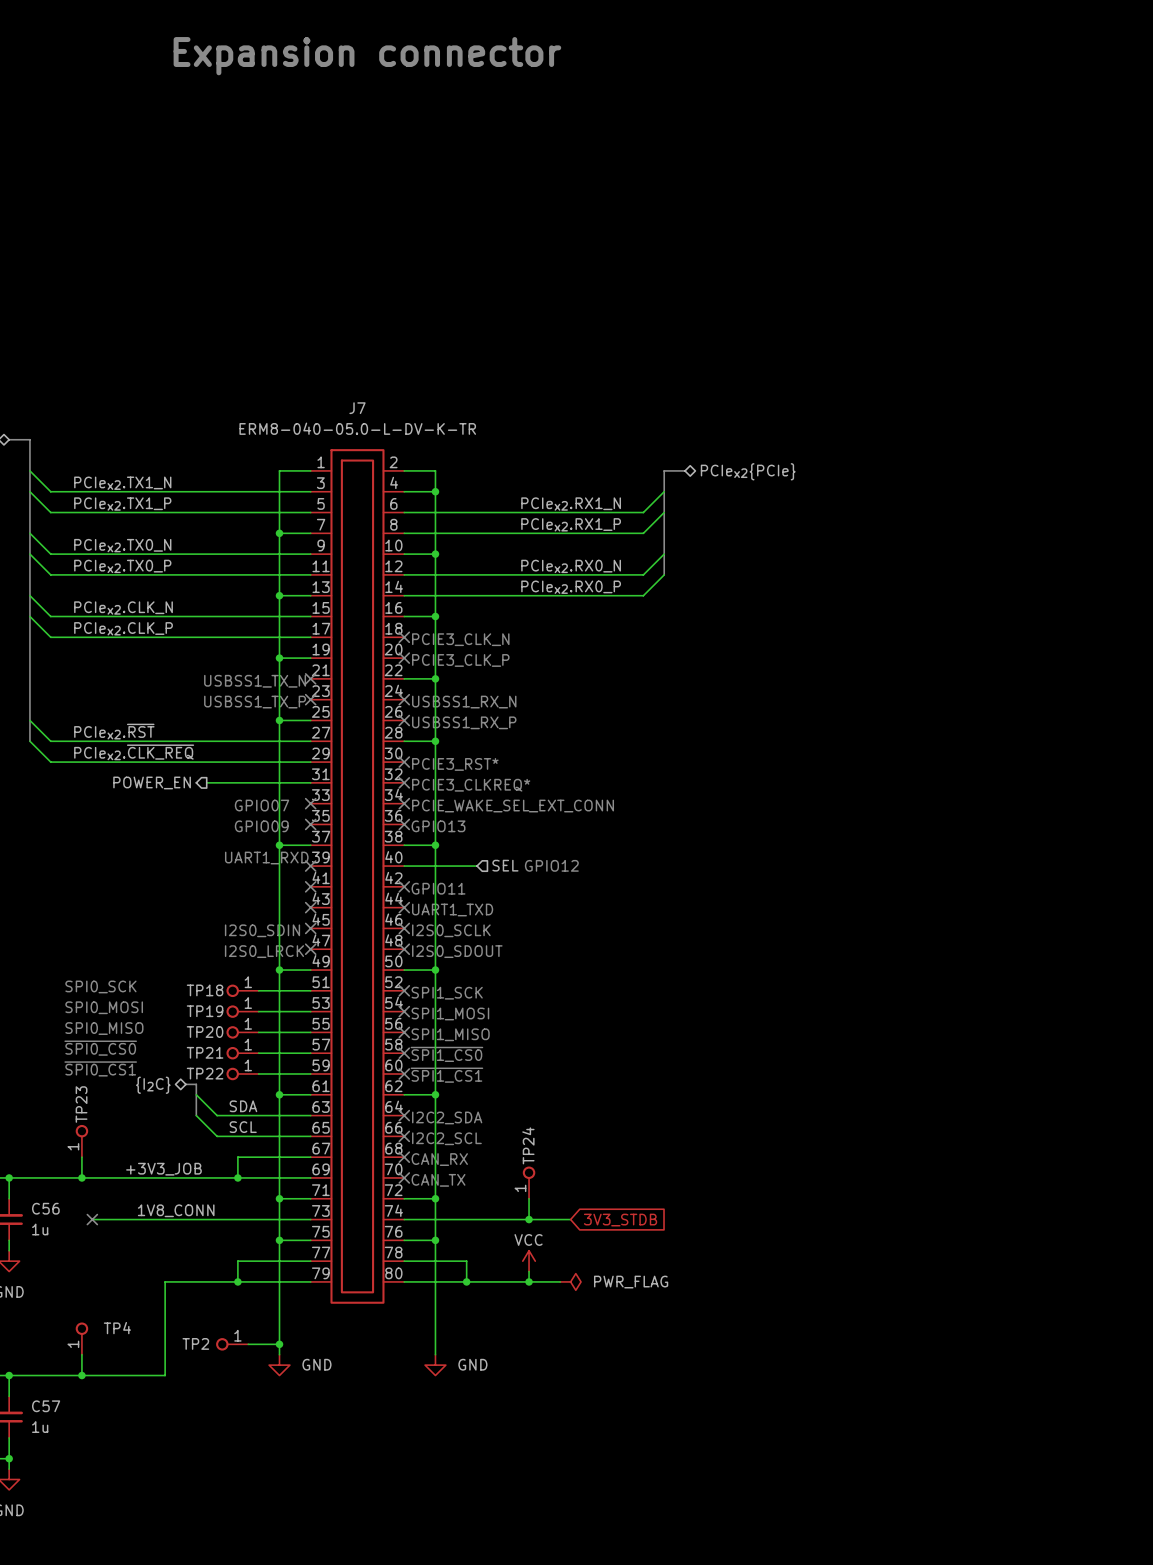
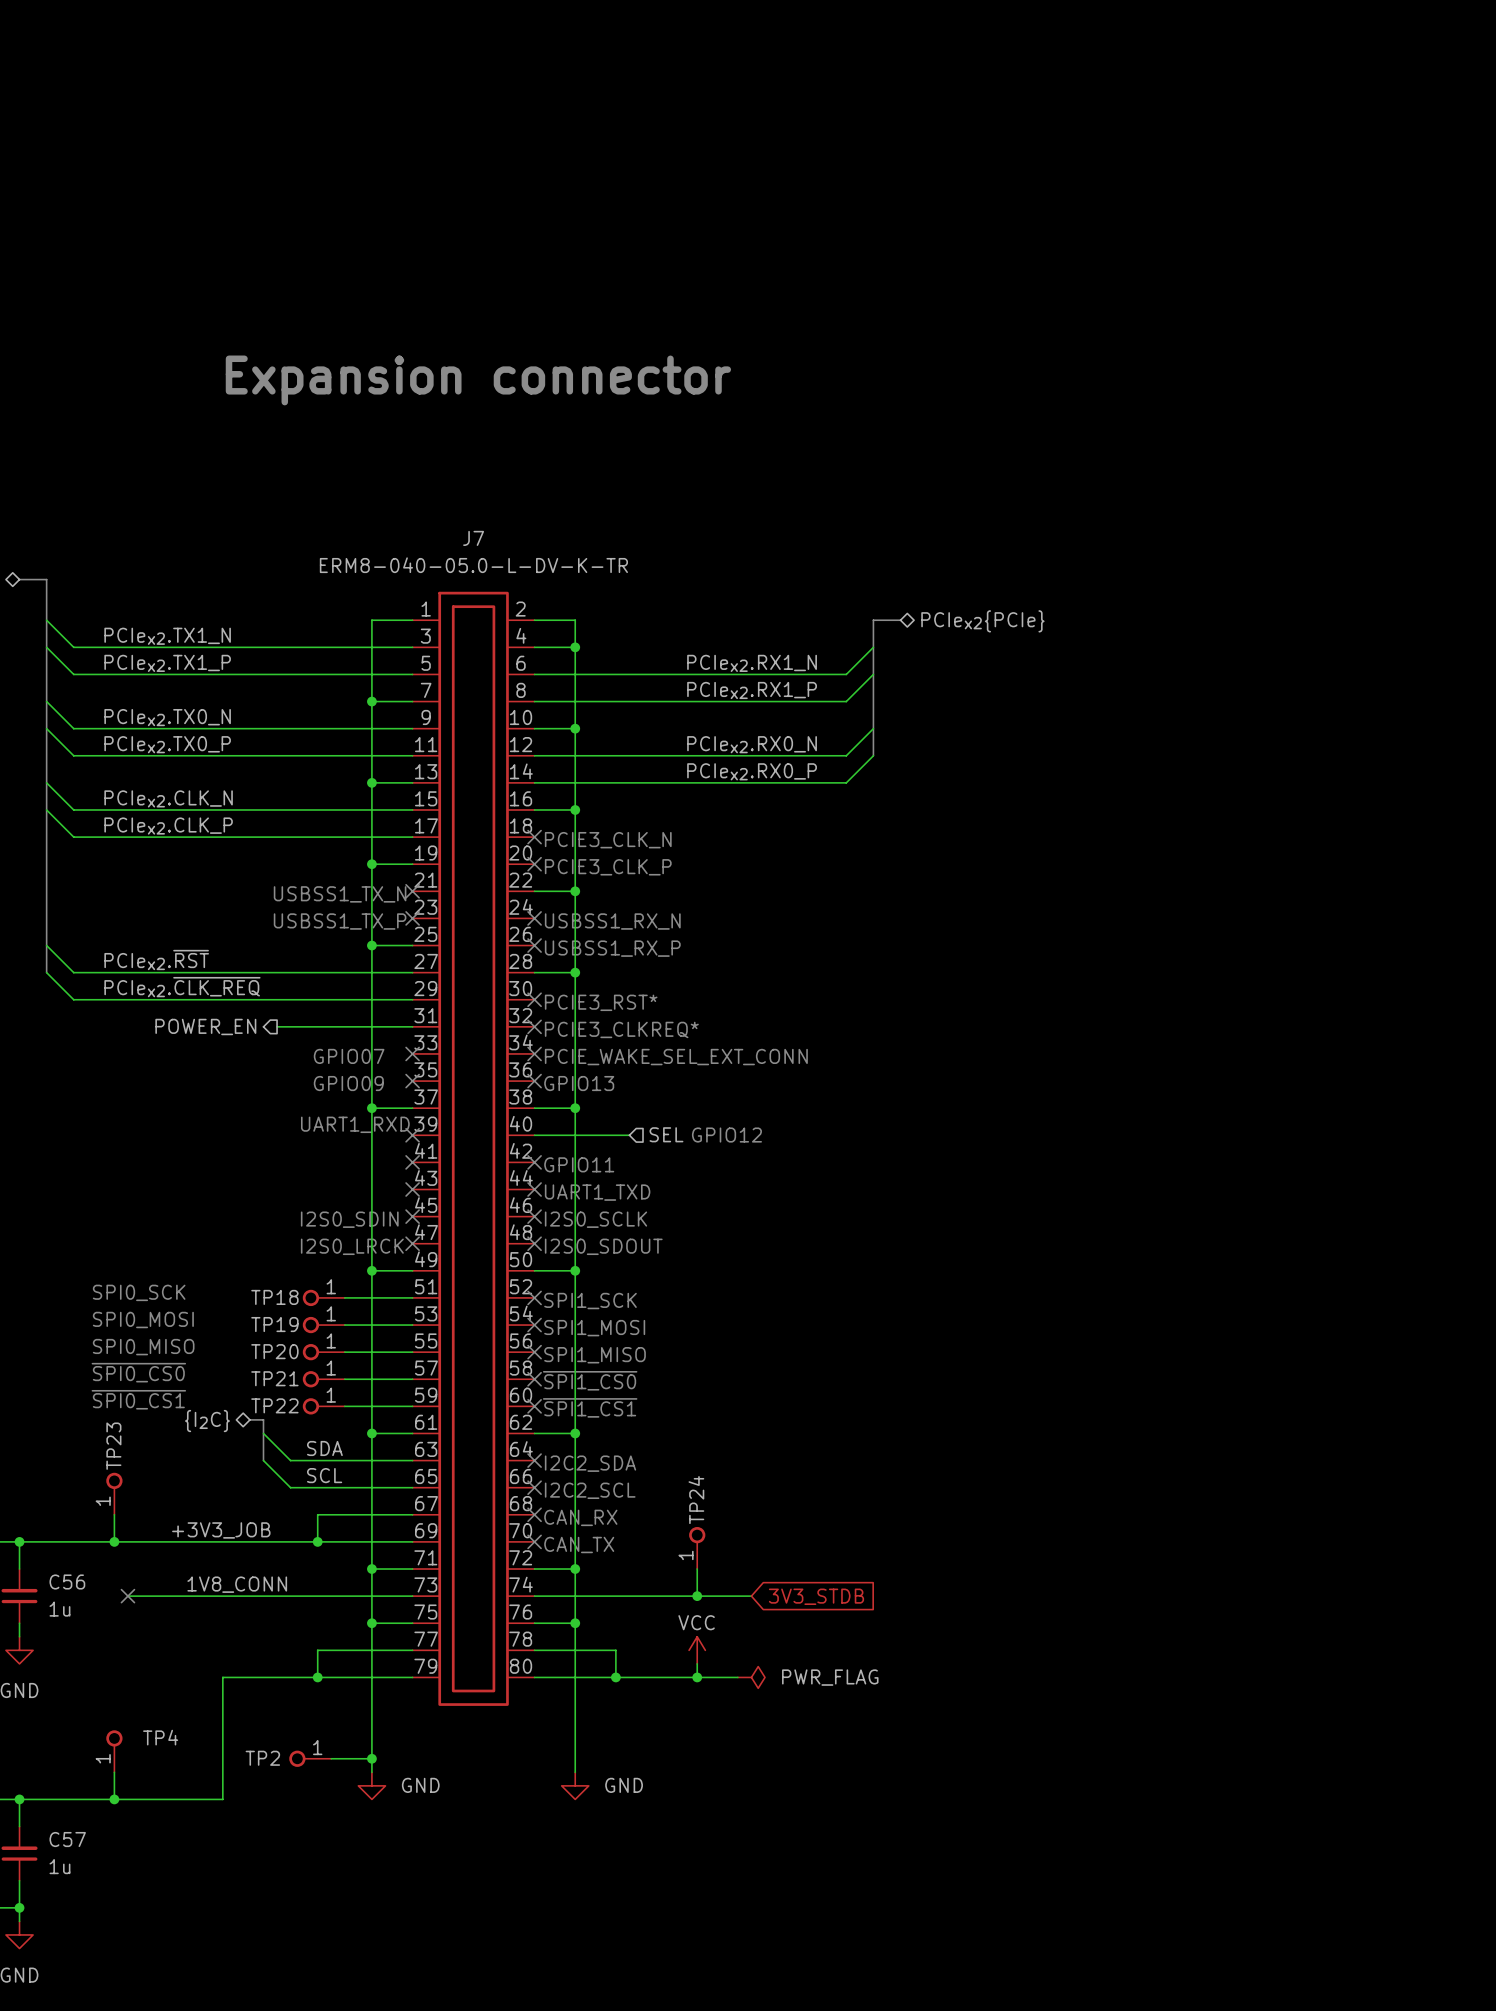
text: Expansion connector (367, 56) -> none
text: none -> Expansion connector (478, 380)

